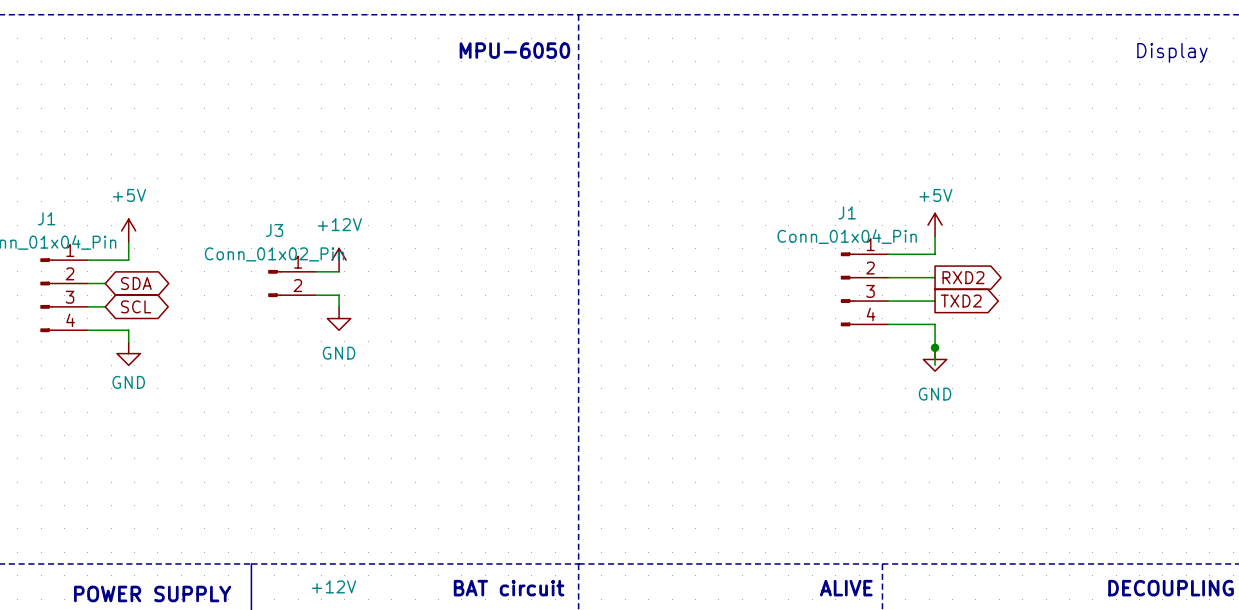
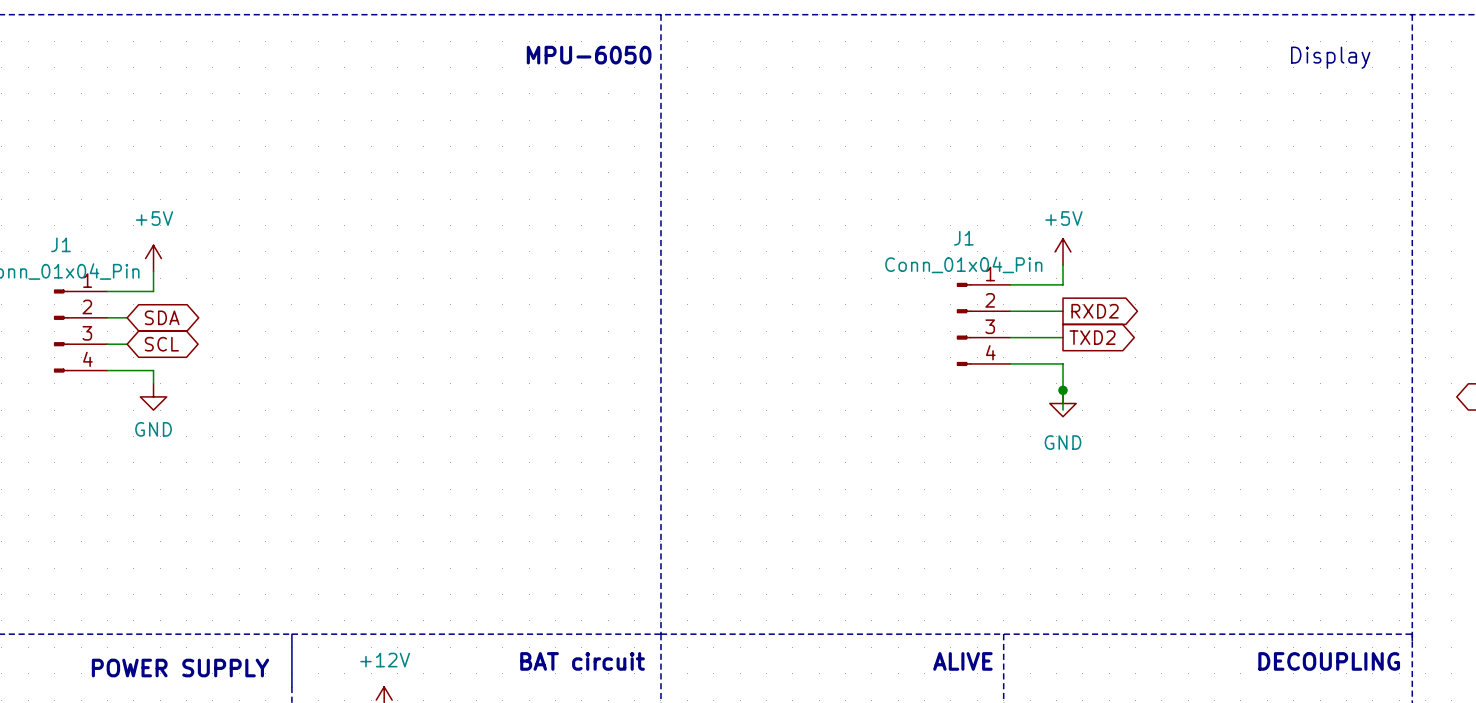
power symbol: +12V (339, 260) -> none
wire: (315, 271) (339, 271) -> none
J3: Conn_01x02_Pin (291, 283) -> none
wire: (315, 295) (339, 295) (339, 306) -> none
power symbol: GND (339, 318) -> none

